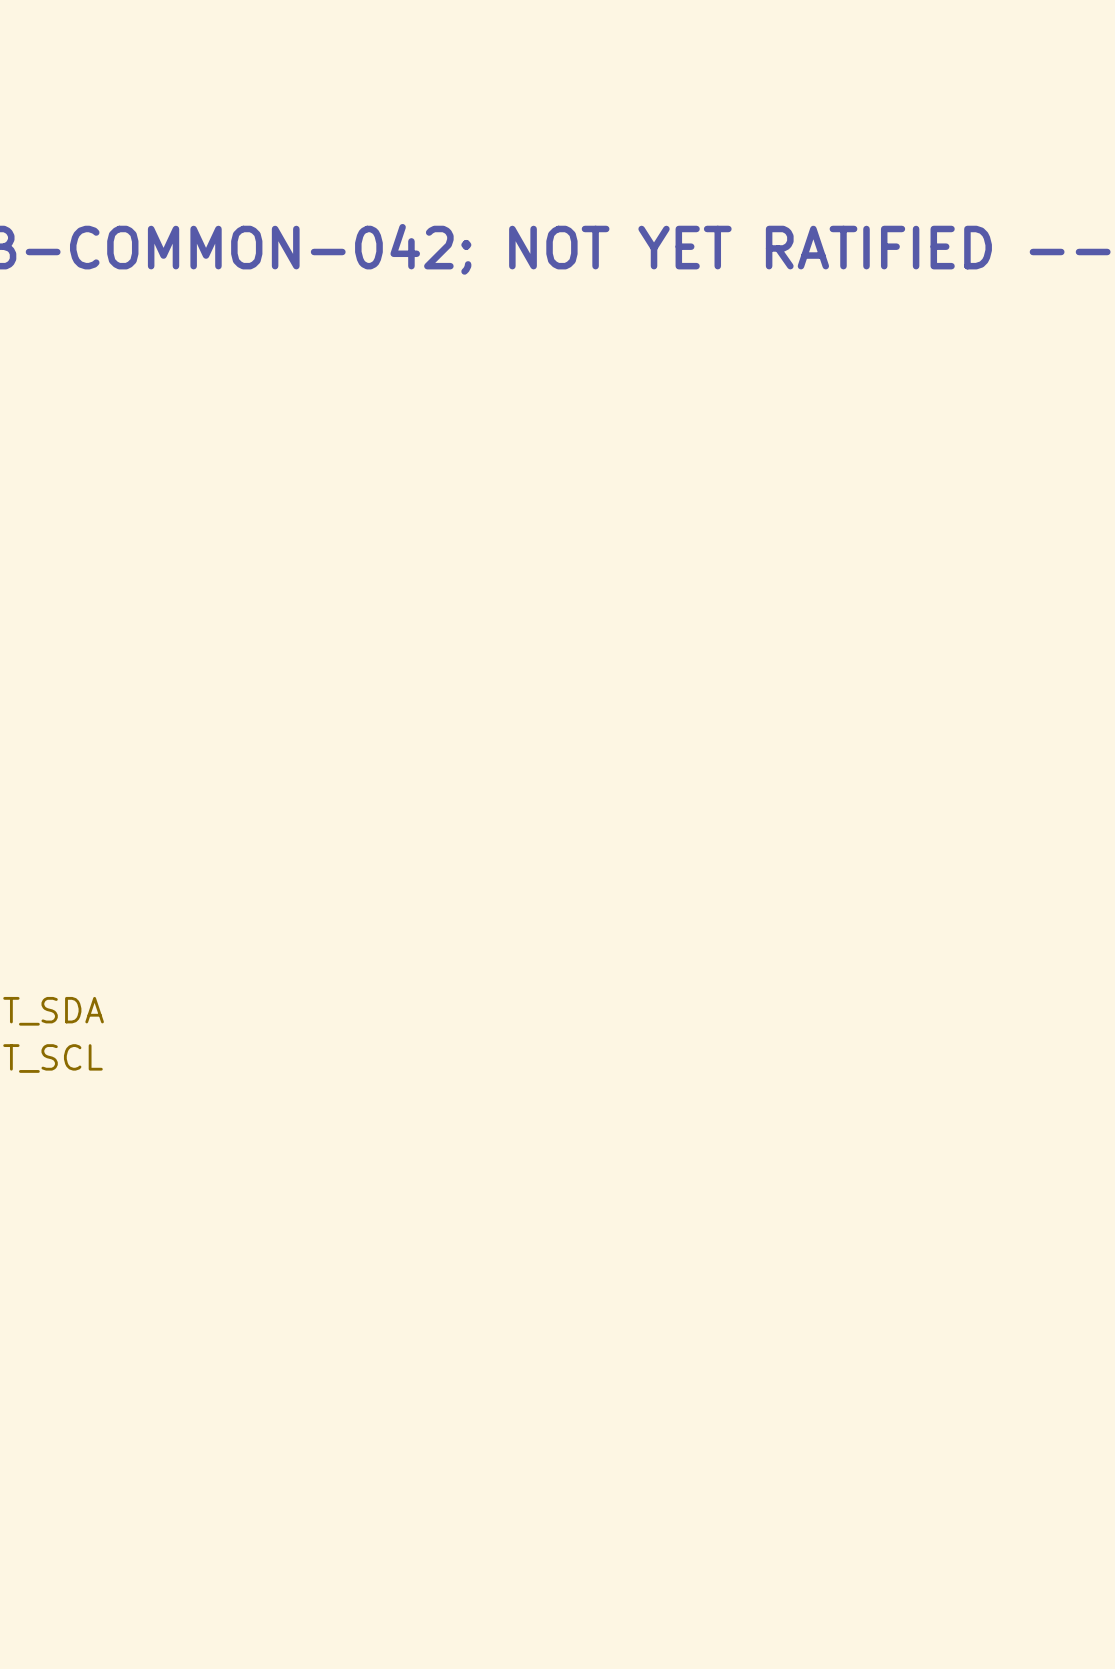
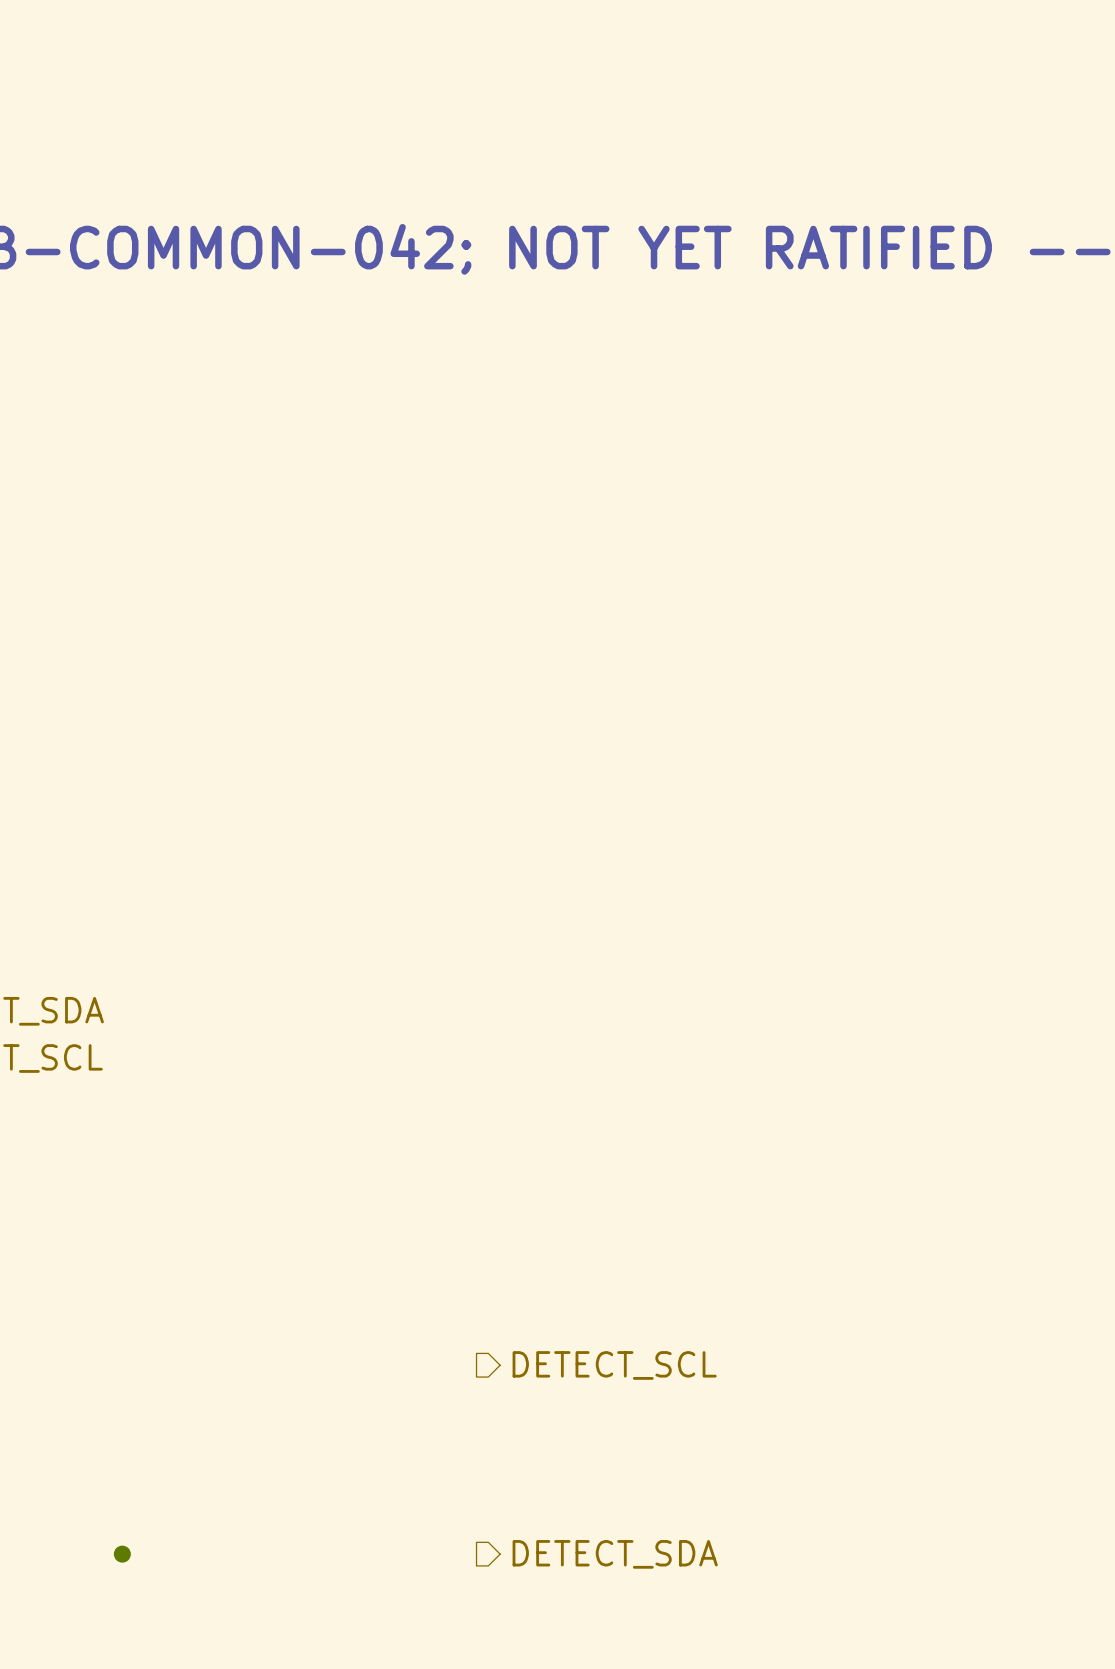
hierarchical label: none -> DETECT_SCL (614, 1365)
junction: none -> (122, 1554)
hierarchical label: none -> DETECT_SDA (615, 1554)

